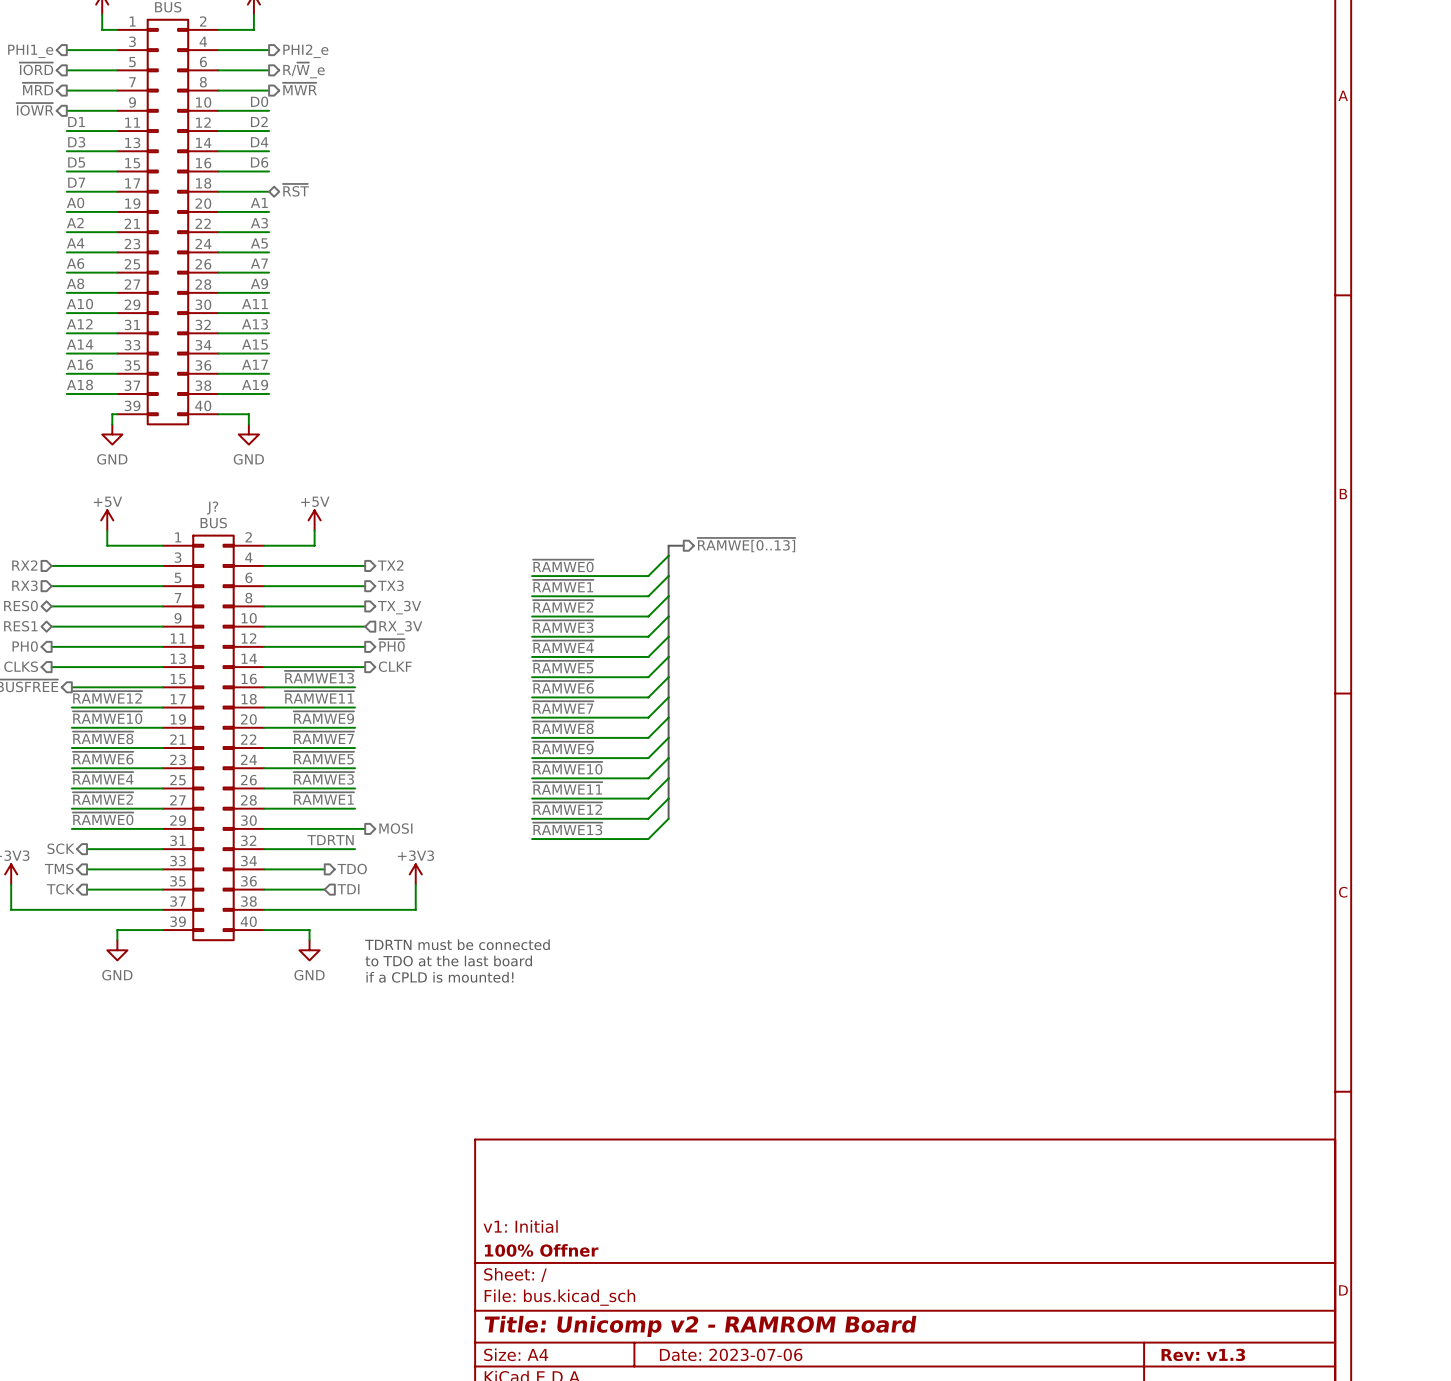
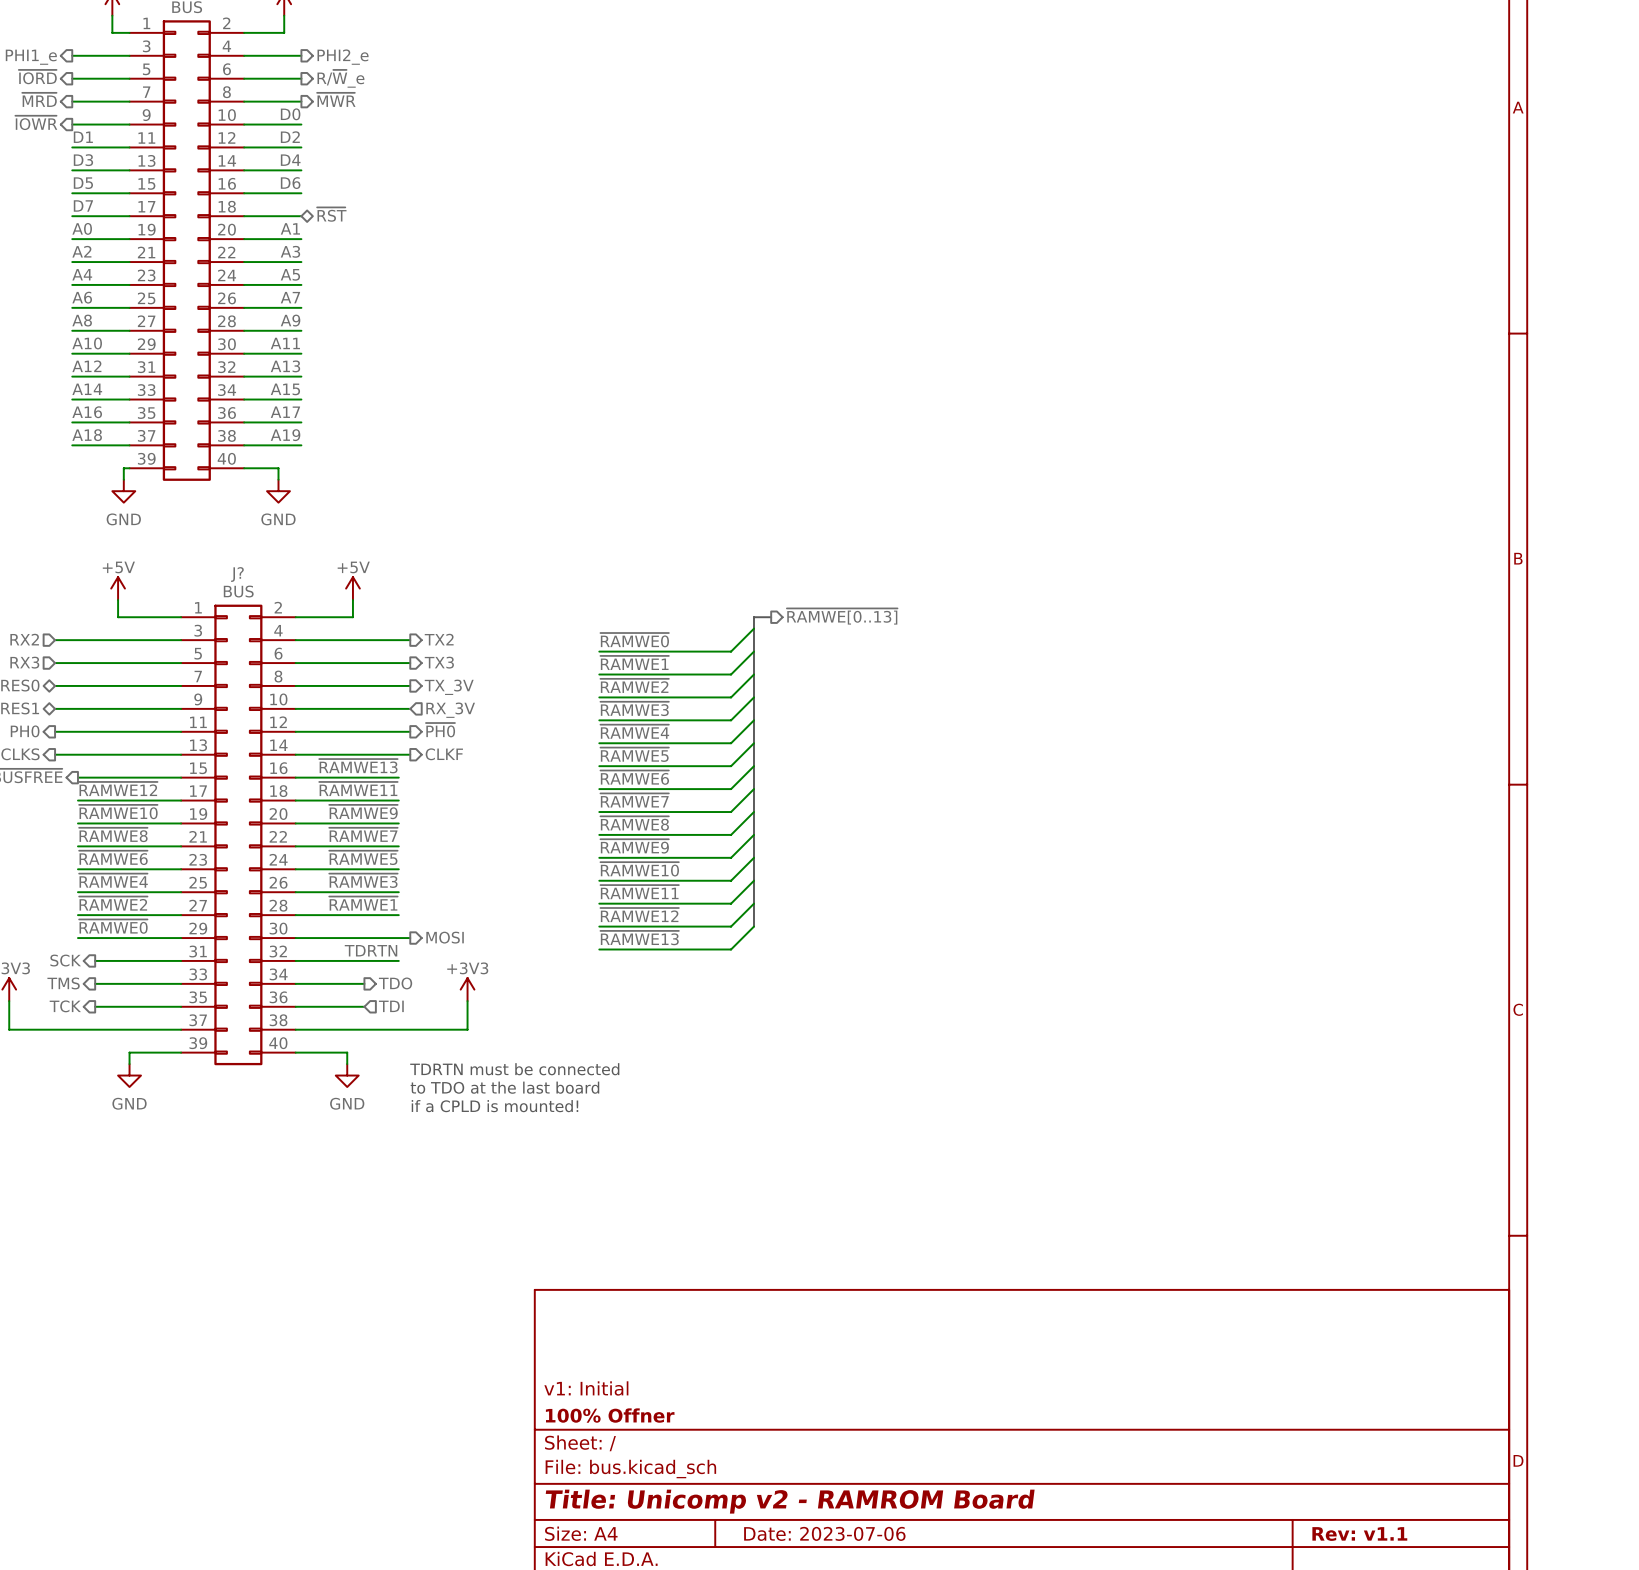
title block: Rev: v1.3 (1203, 1354) -> Rev: v1.1 (1359, 1534)

